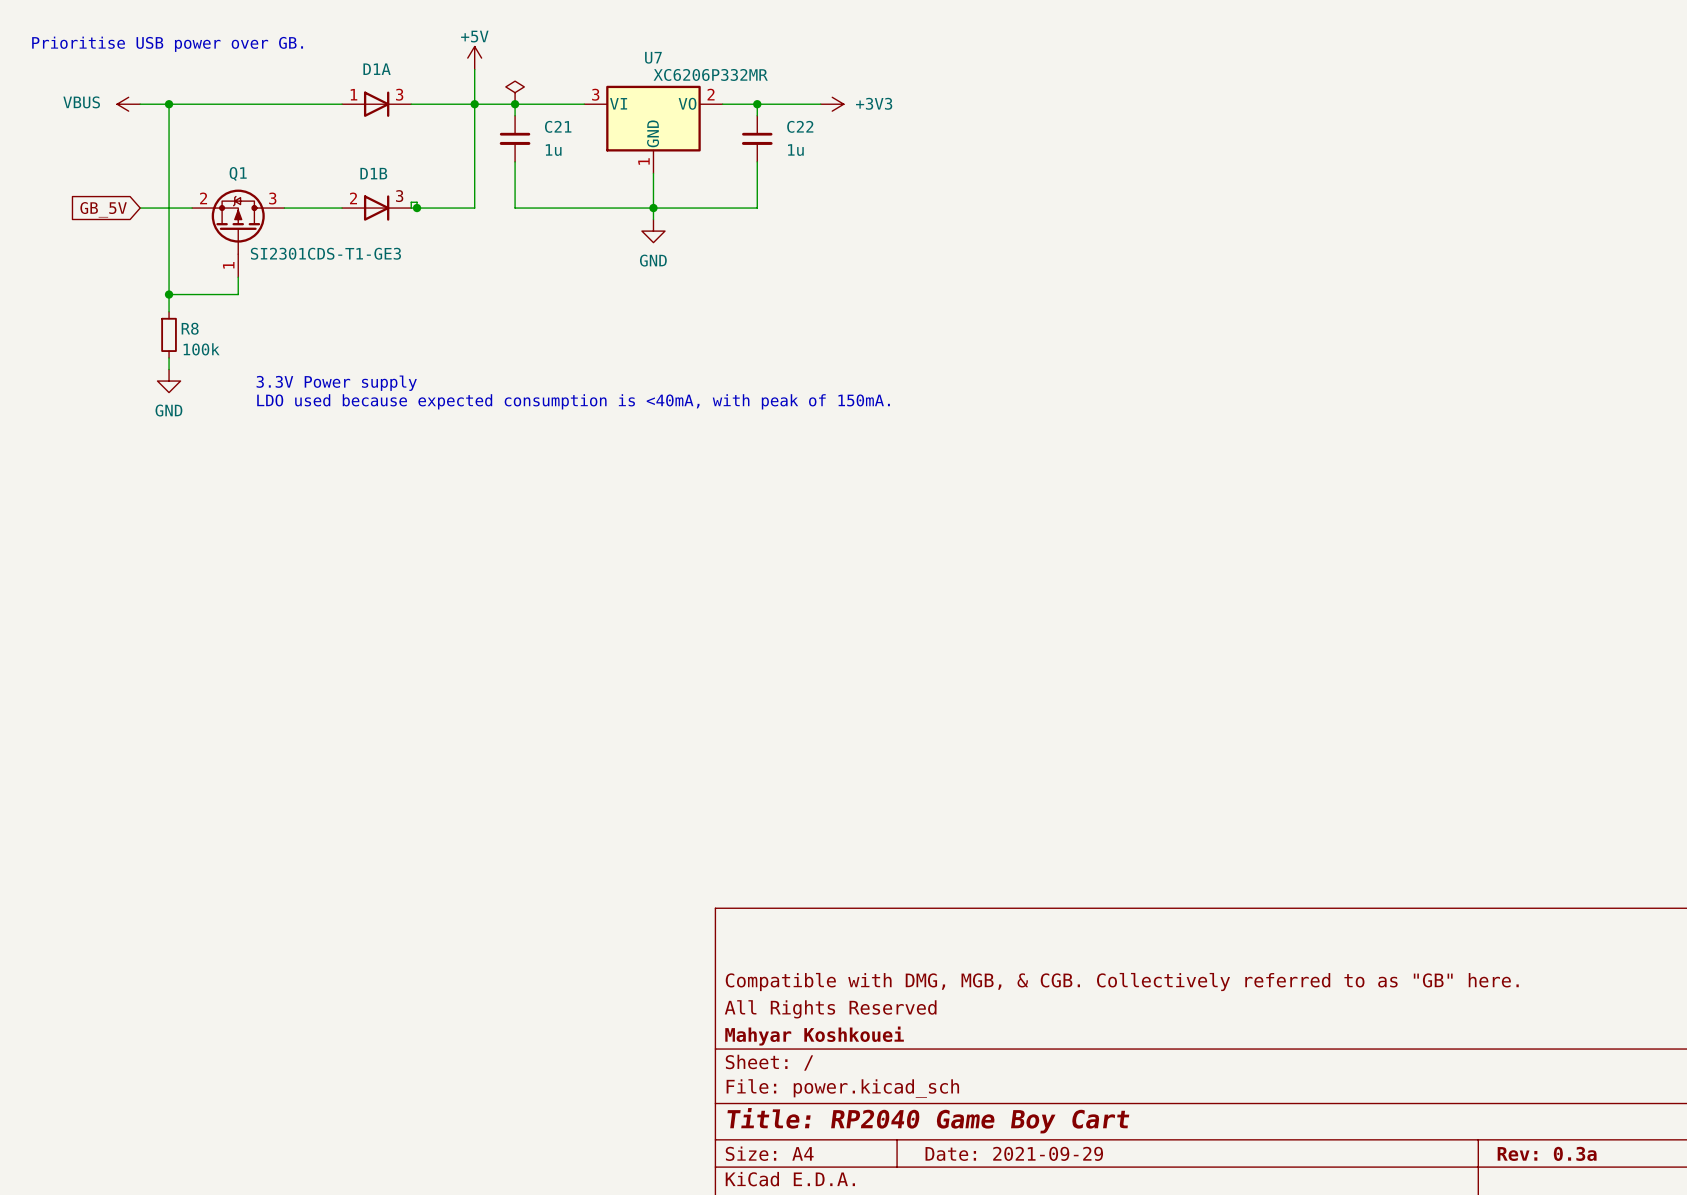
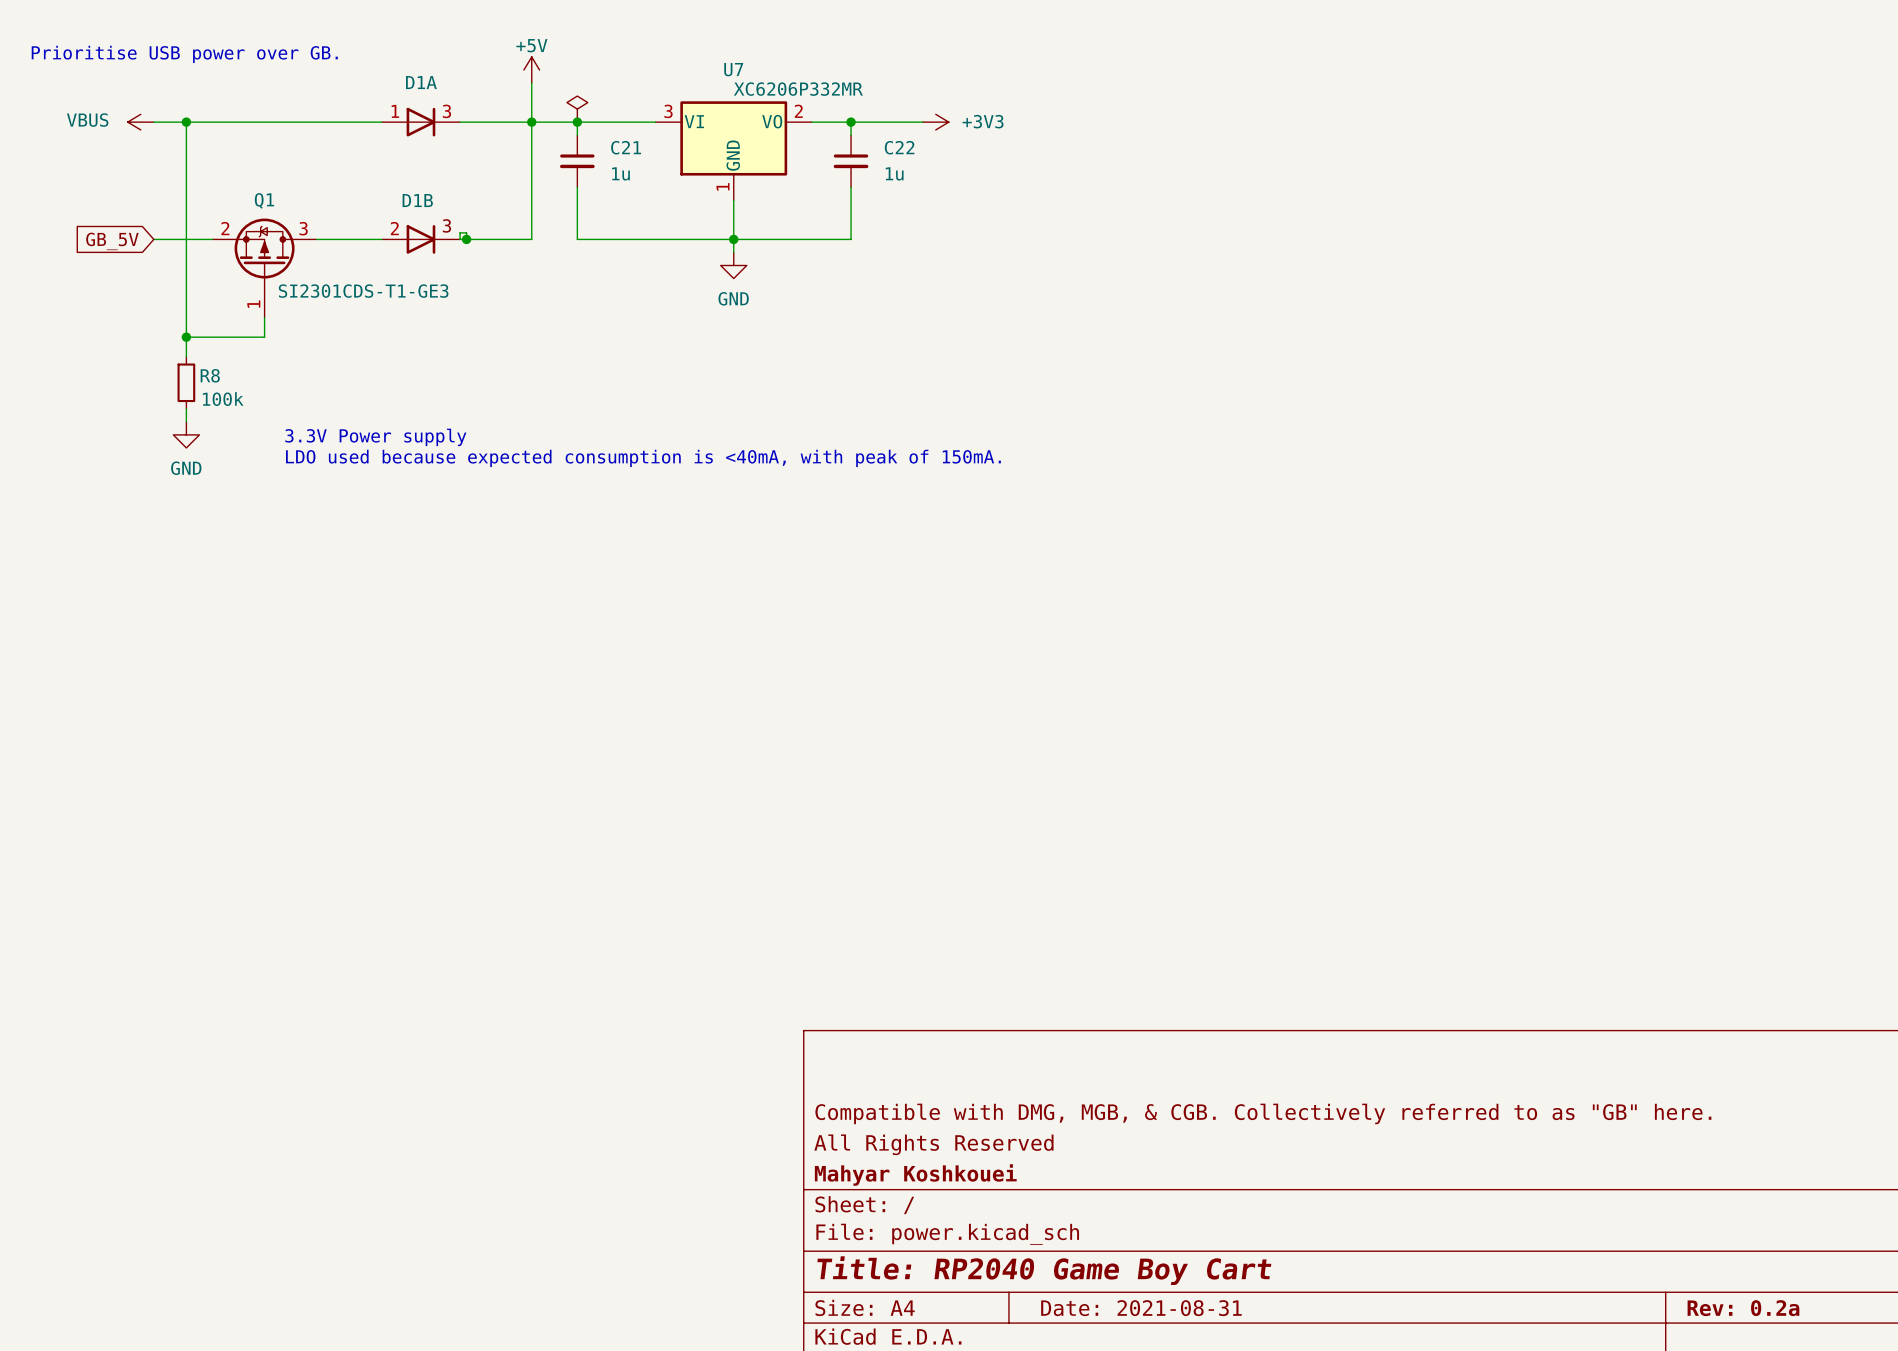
title block: Date: 2021-09-29 (1014, 1153) -> Date: 2021-08-31 (1141, 1308)
title block: Rev: 0.3a (1547, 1153) -> Rev: 0.2a (1743, 1308)

